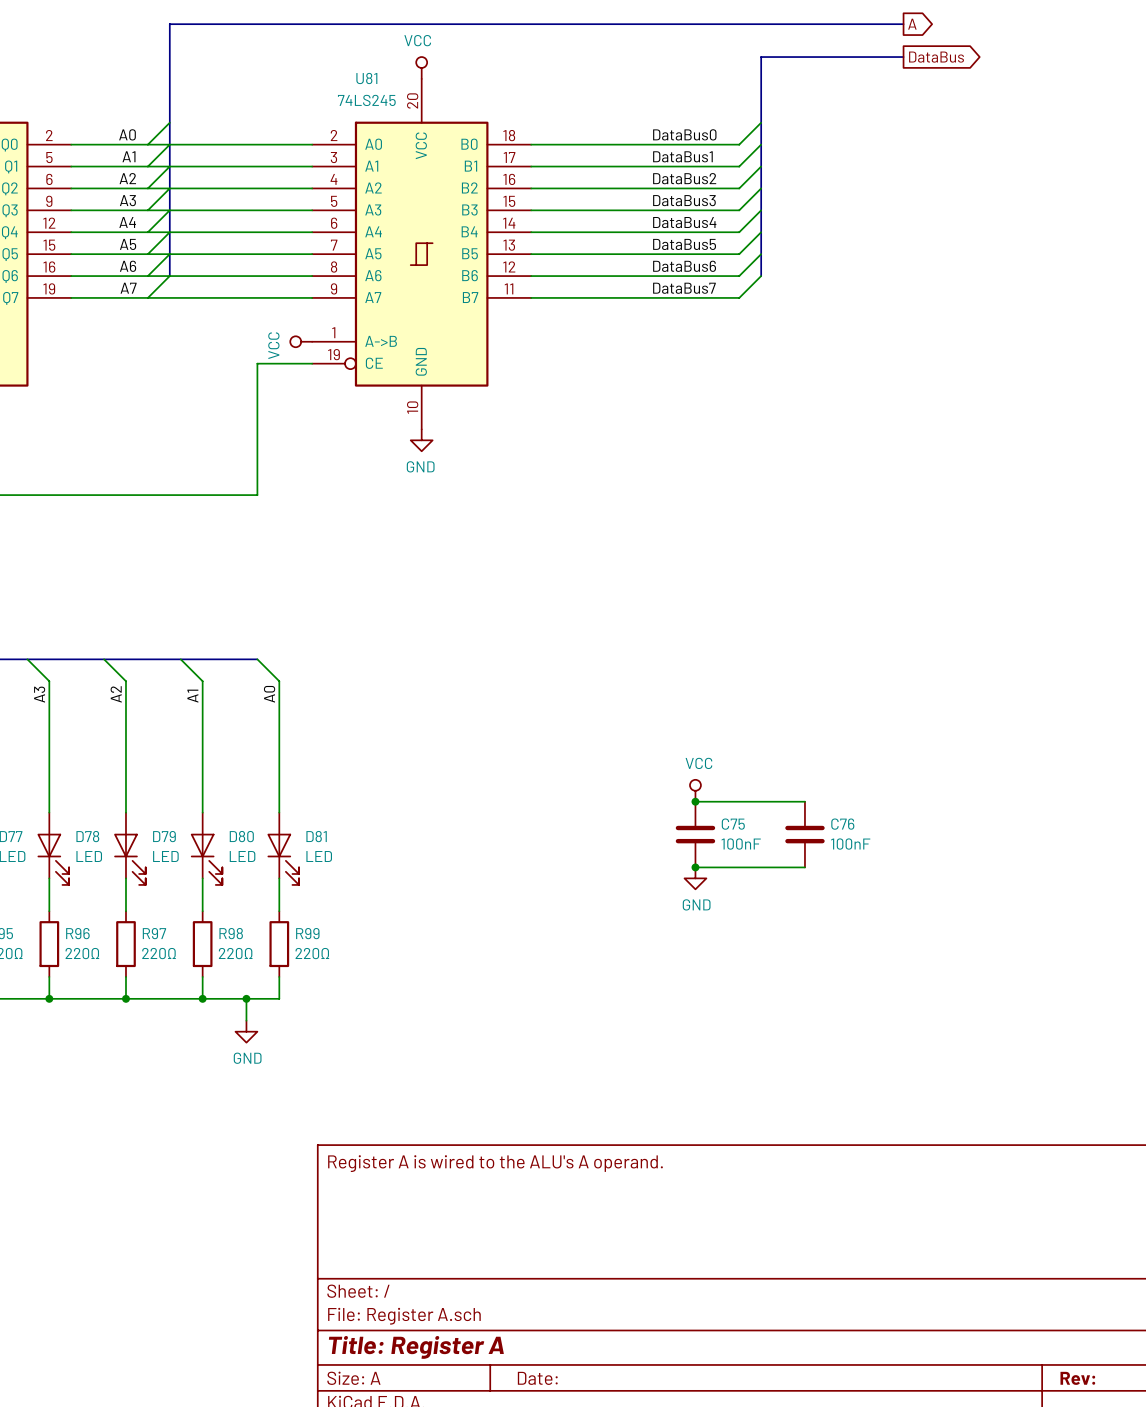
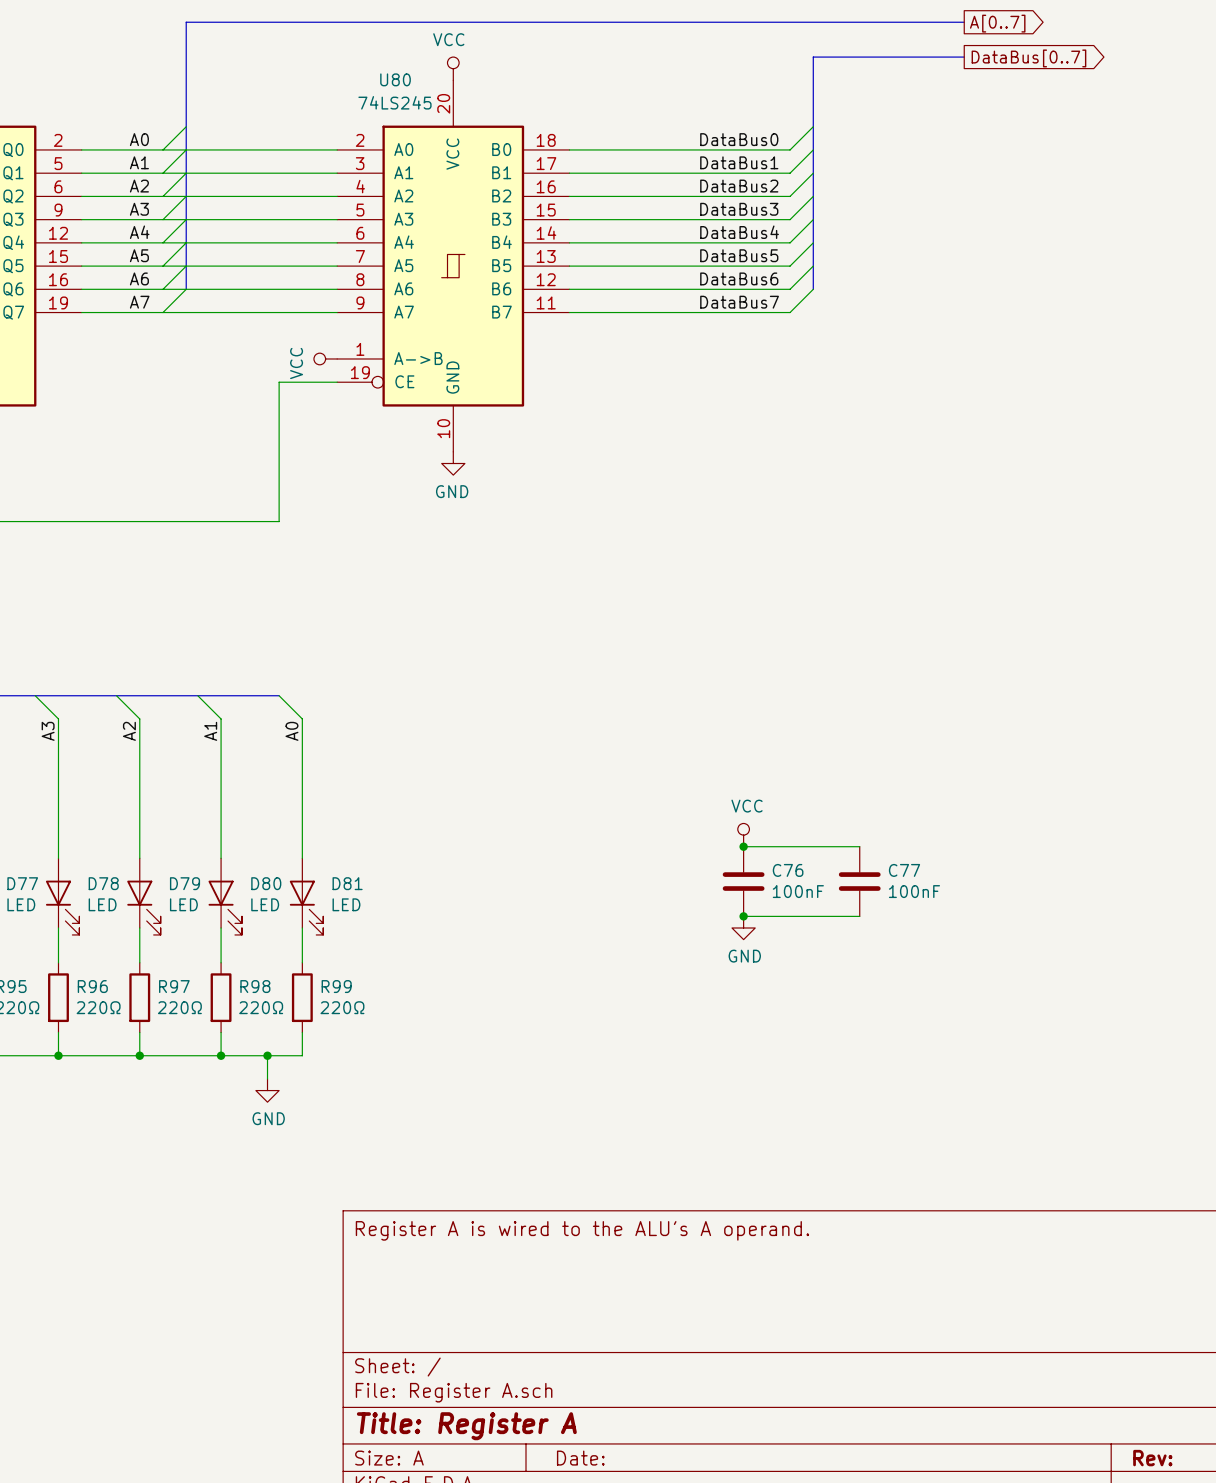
global label: A (912, 24) -> A[0..7] (997, 23)
global label: DataBus (936, 57) -> DataBus[0..7] (1028, 58)
U81 name: U81 (366, 78) -> U80 (395, 79)
C75 name: C75 (733, 824) -> C76 (788, 870)
C76 name: C76 (842, 824) -> C77 (904, 870)

